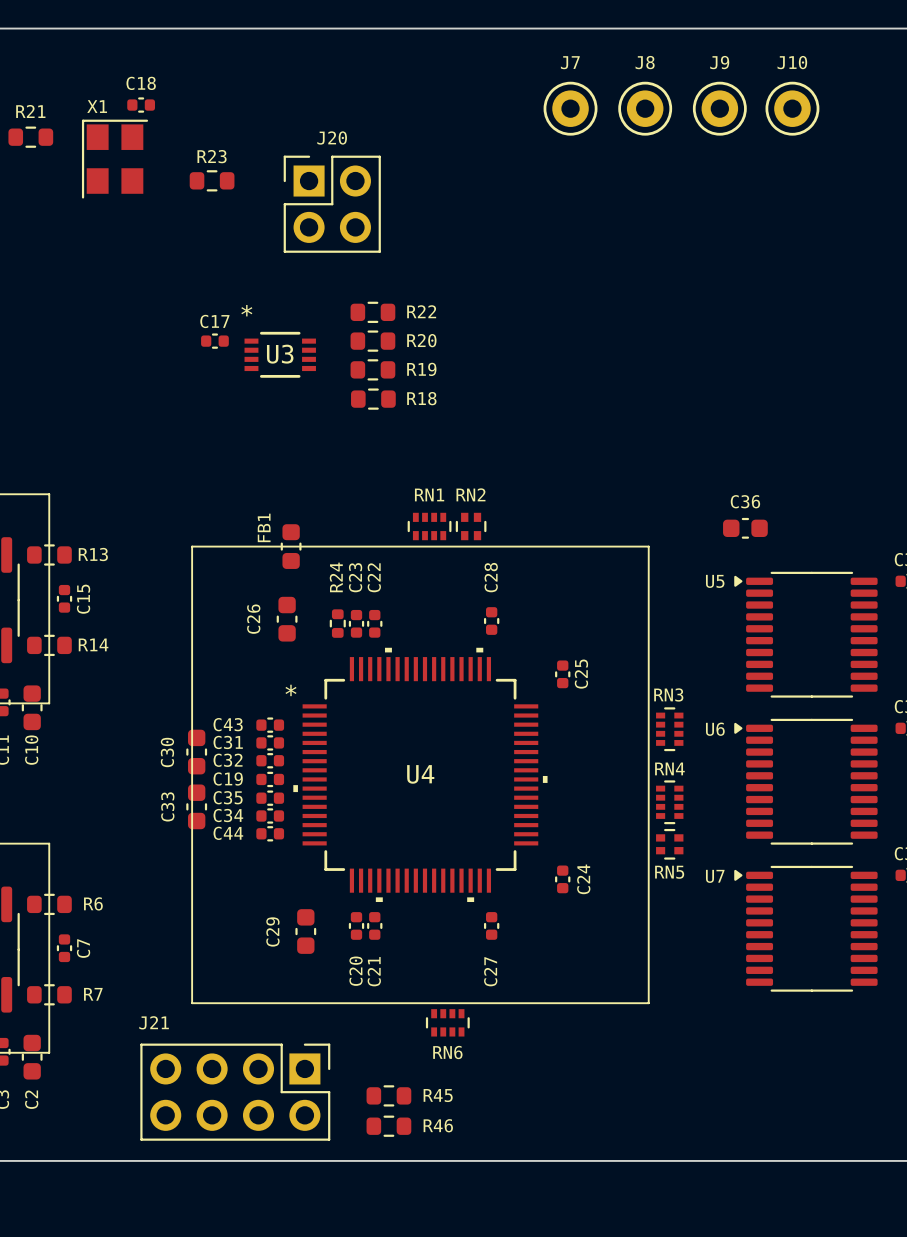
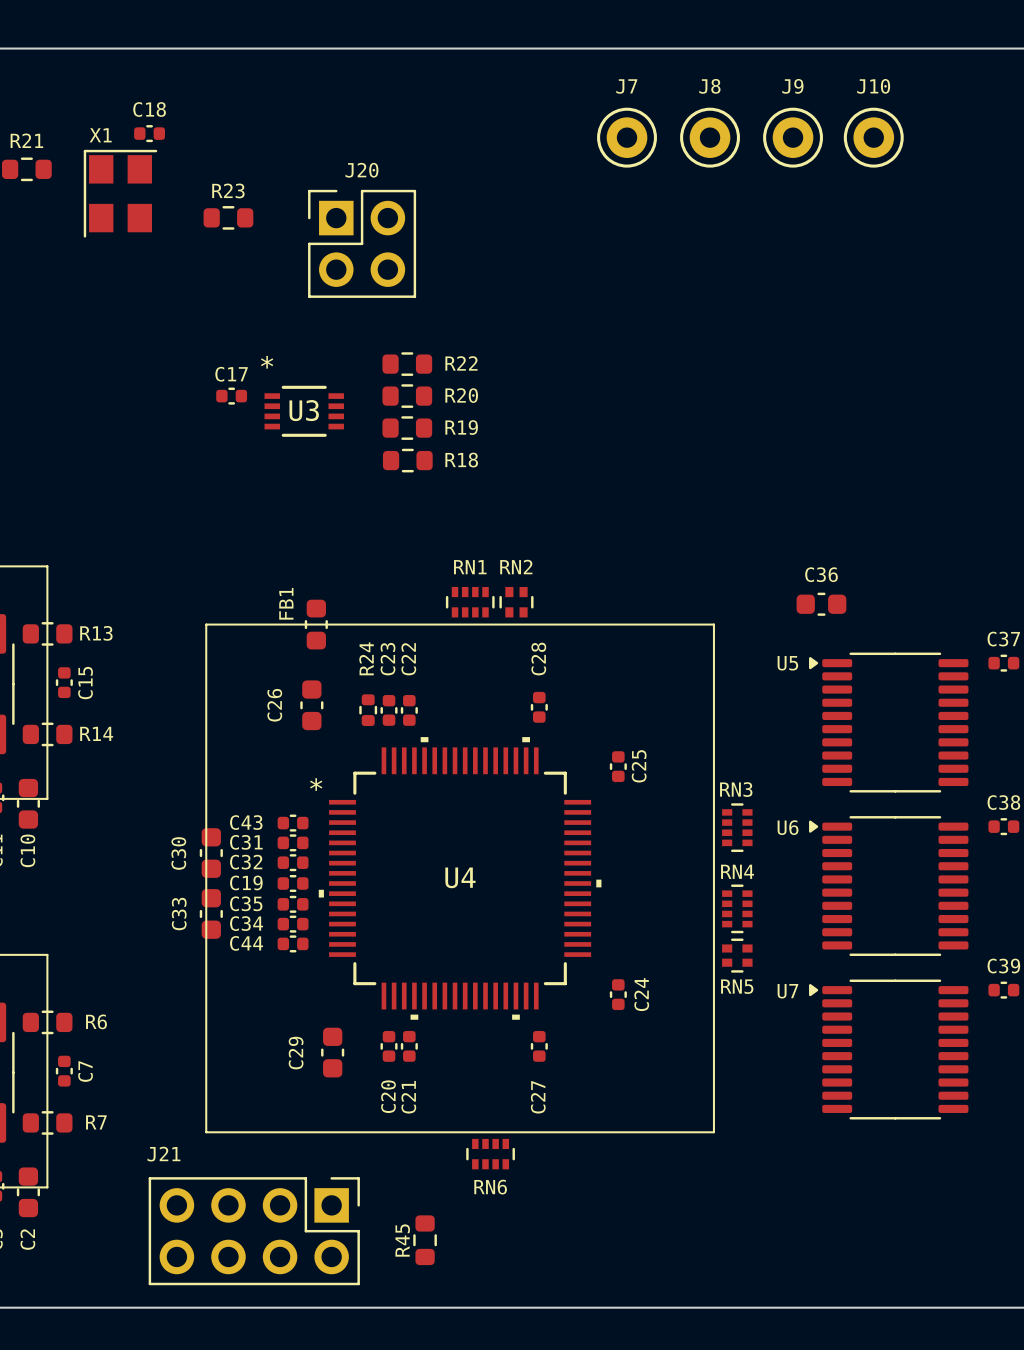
R45 rotation: 0° (388, 1095) -> 90° clockwise (425, 1240)
R45 name position: R45 (438, 1095) -> R45 (402, 1240)
R46: (388, 1126) -> none

